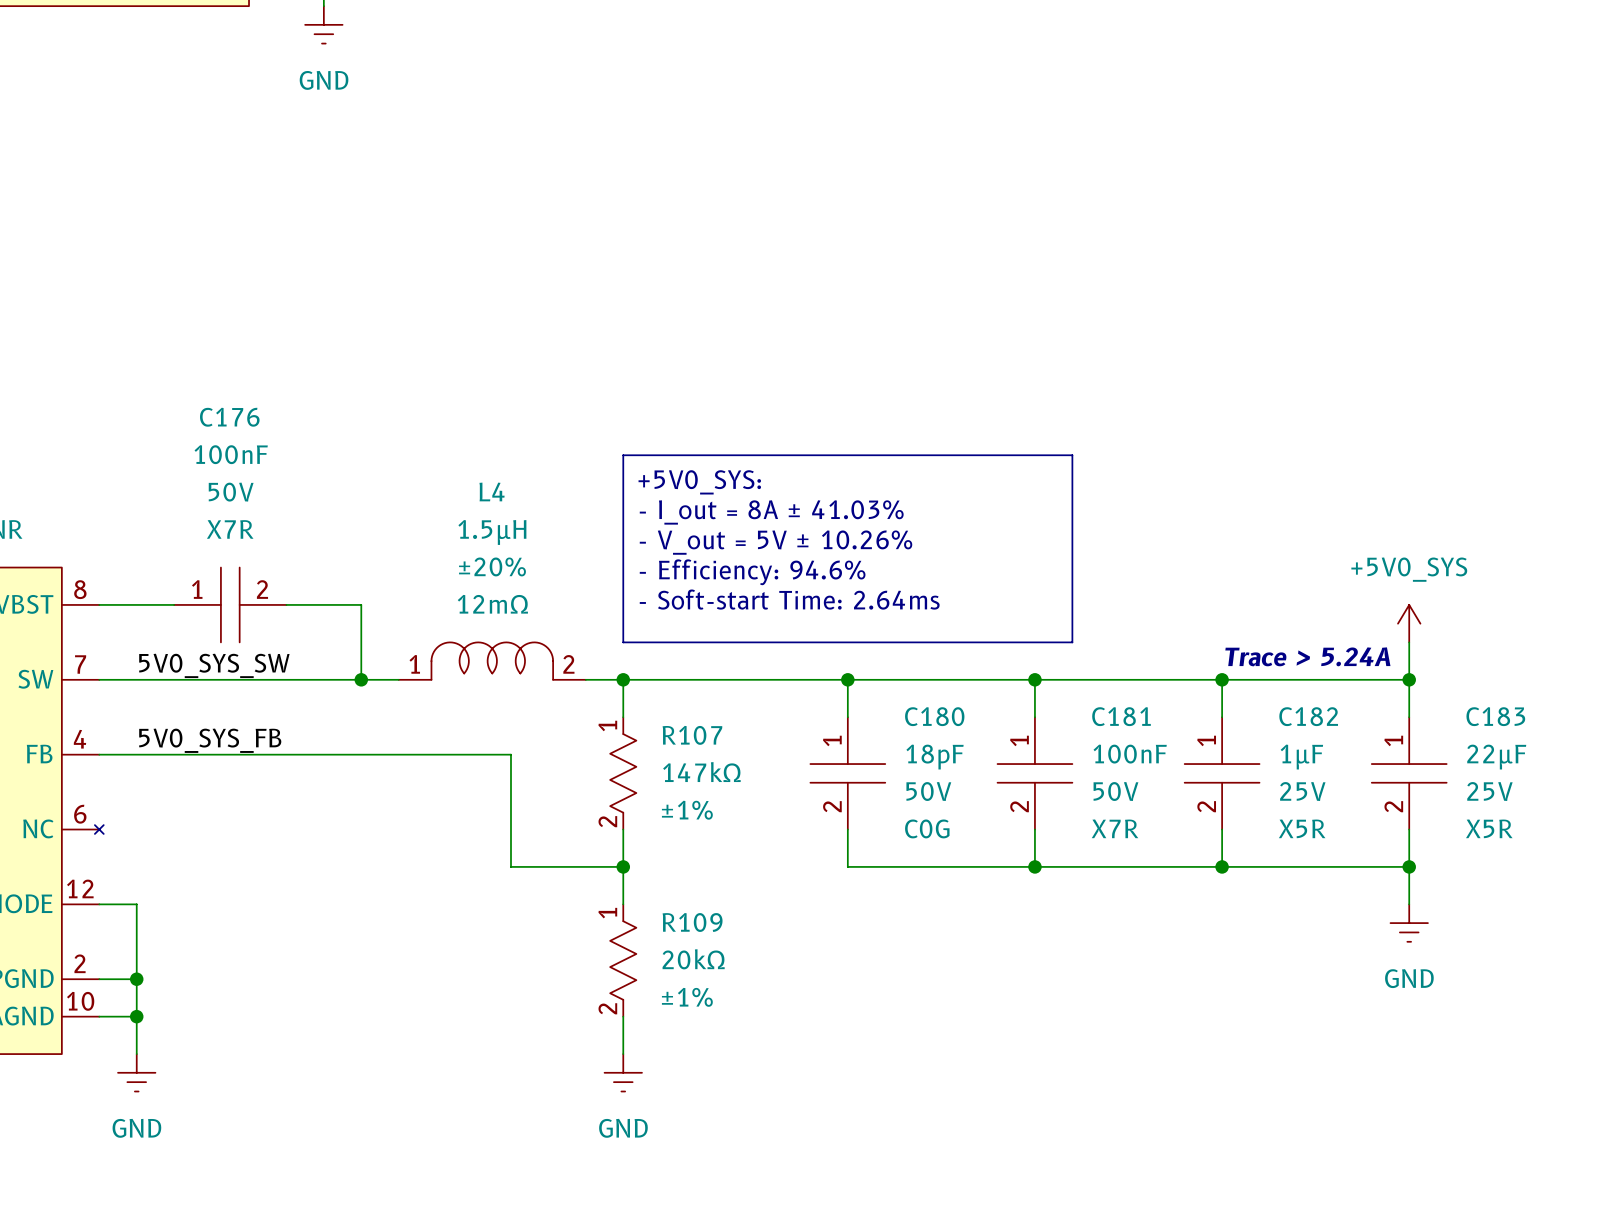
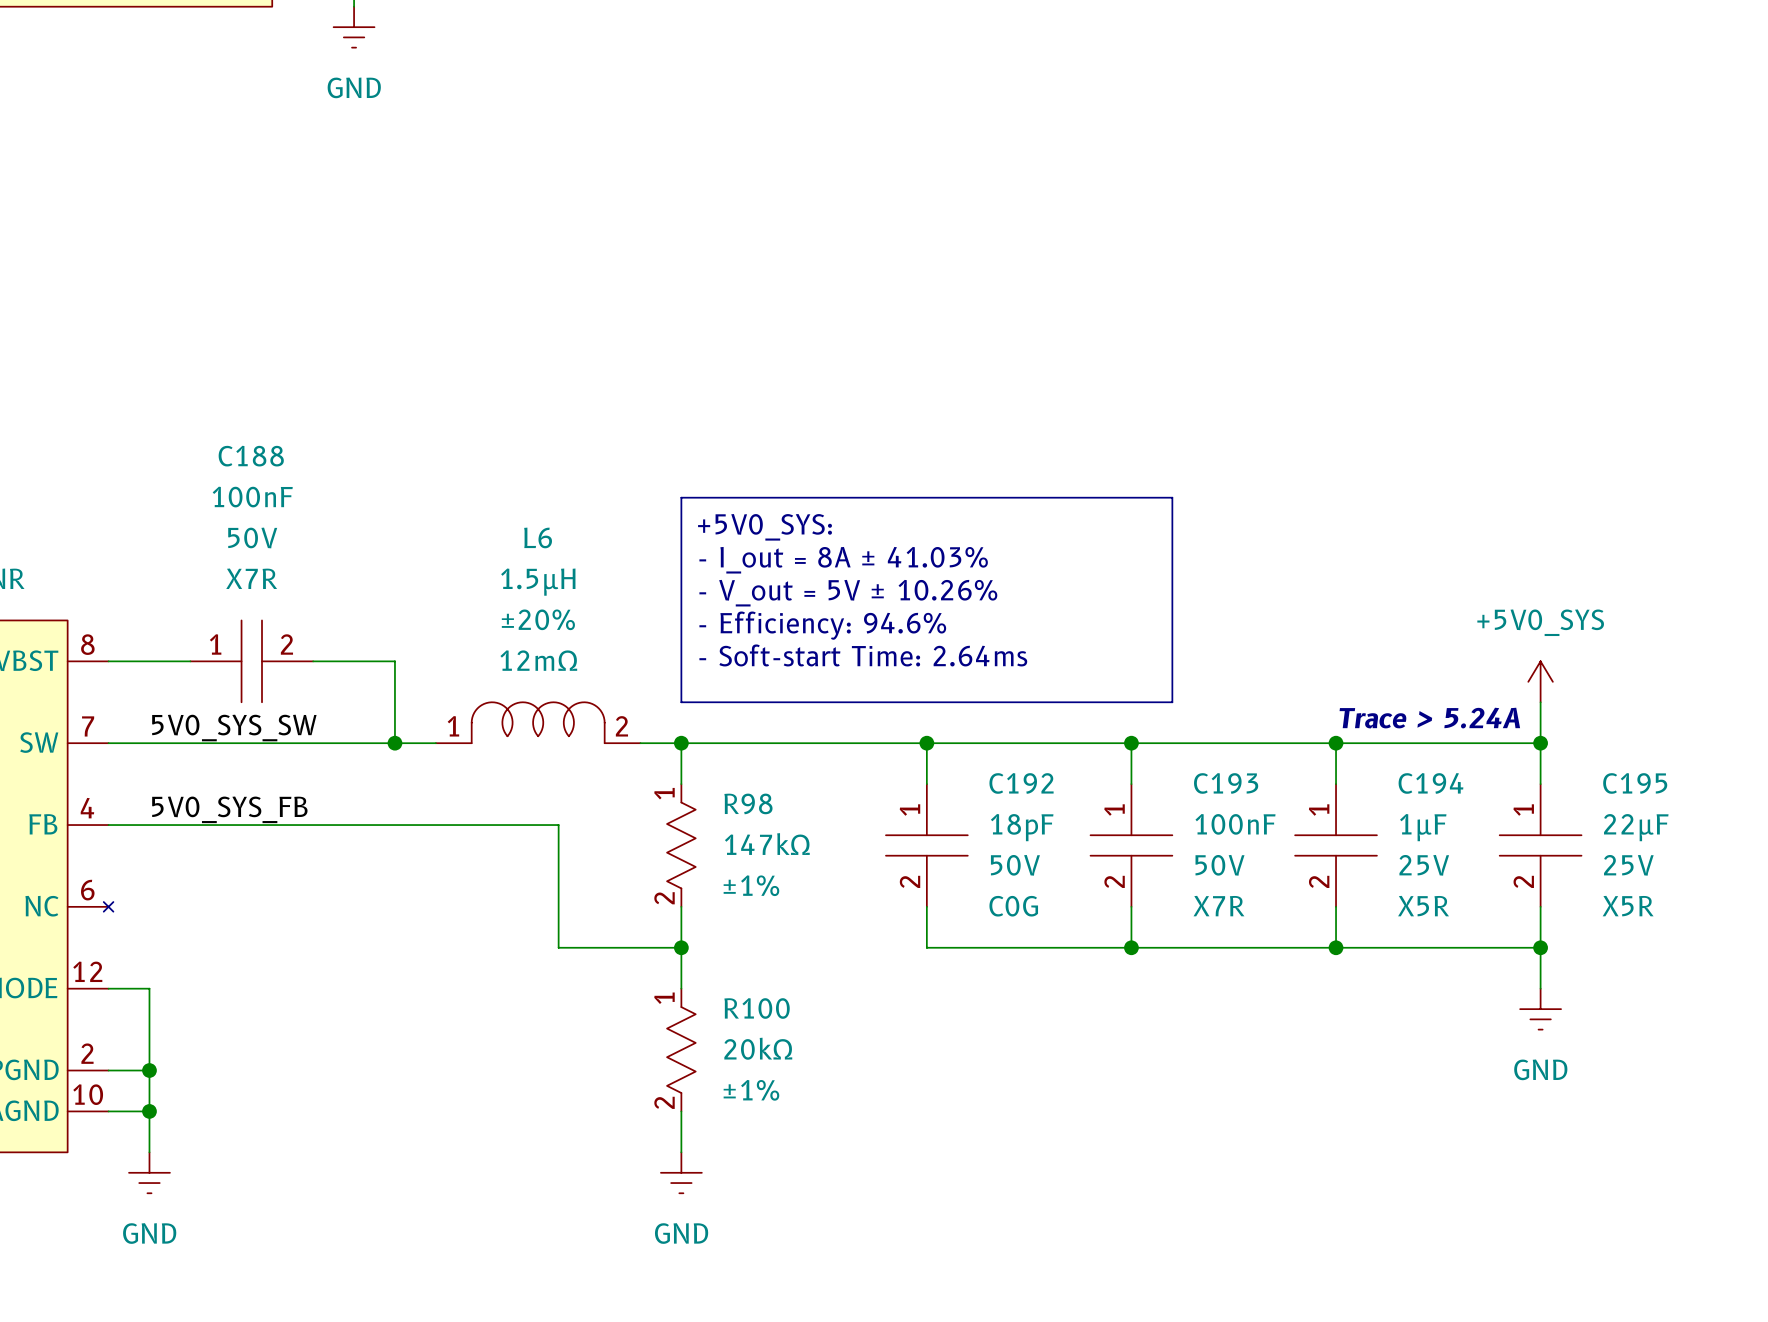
C176 name: C176 (229, 417) -> C188 (251, 456)
L4 name: L4 (492, 491) -> L6 (538, 537)
C180 name: C180 (934, 716) -> C192 (1021, 783)
C181 name: C181 (1121, 716) -> C193 (1226, 783)
C182 name: C182 (1308, 716) -> C194 (1430, 783)
C183 name: C183 (1495, 716) -> C195 (1635, 783)
R107 name: R107 (692, 735) -> R98 (748, 803)
R109 name: R109 (692, 922) -> R100 (757, 1008)

